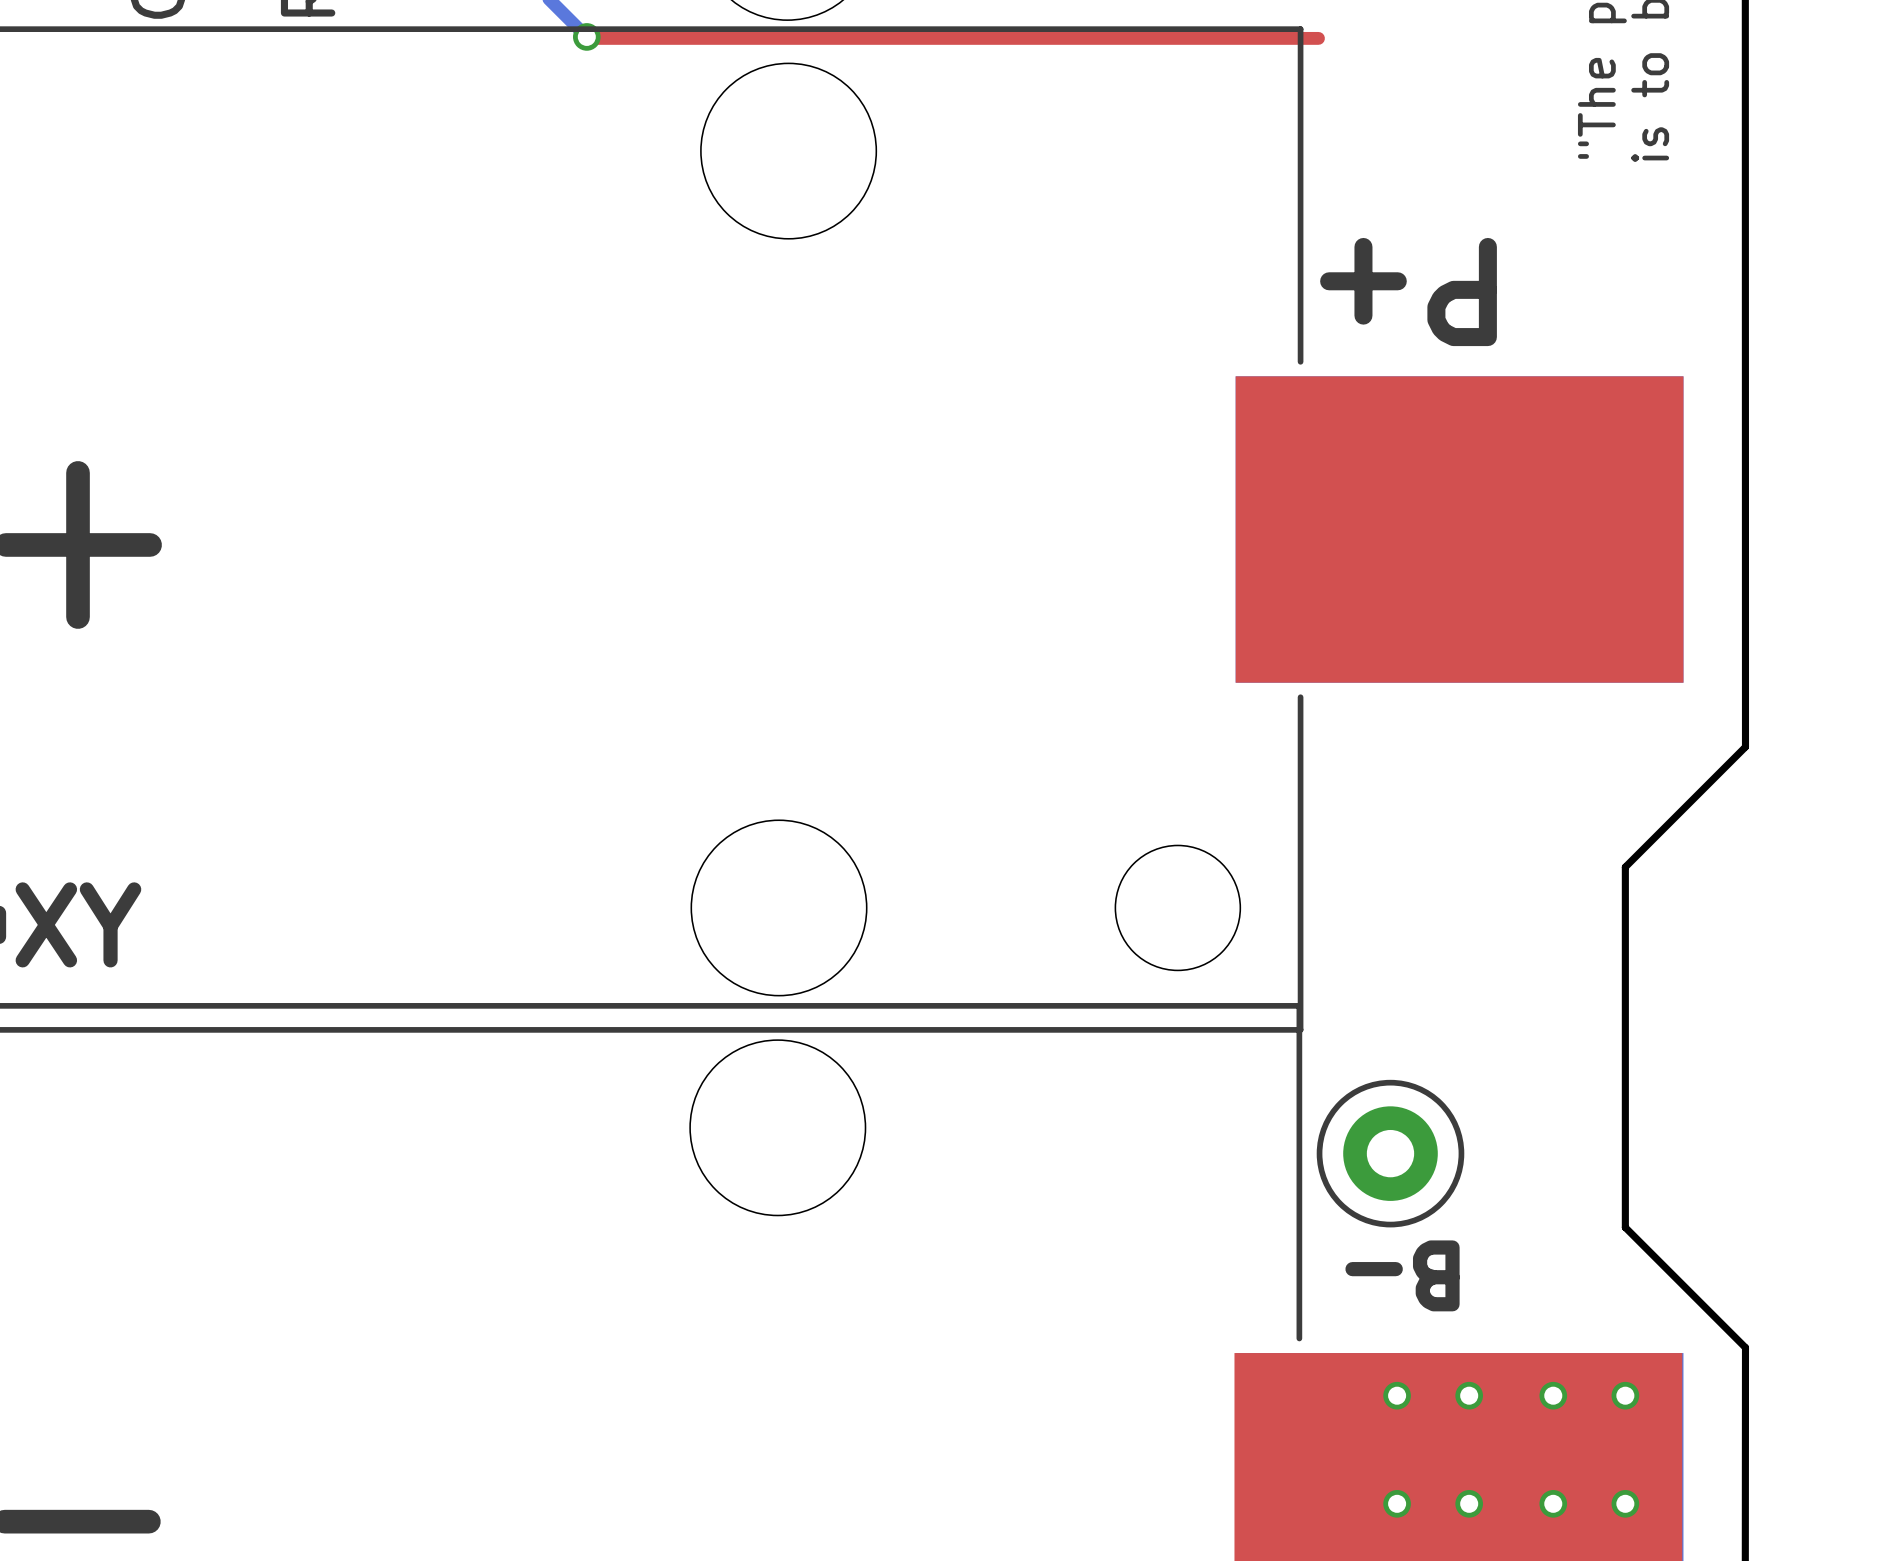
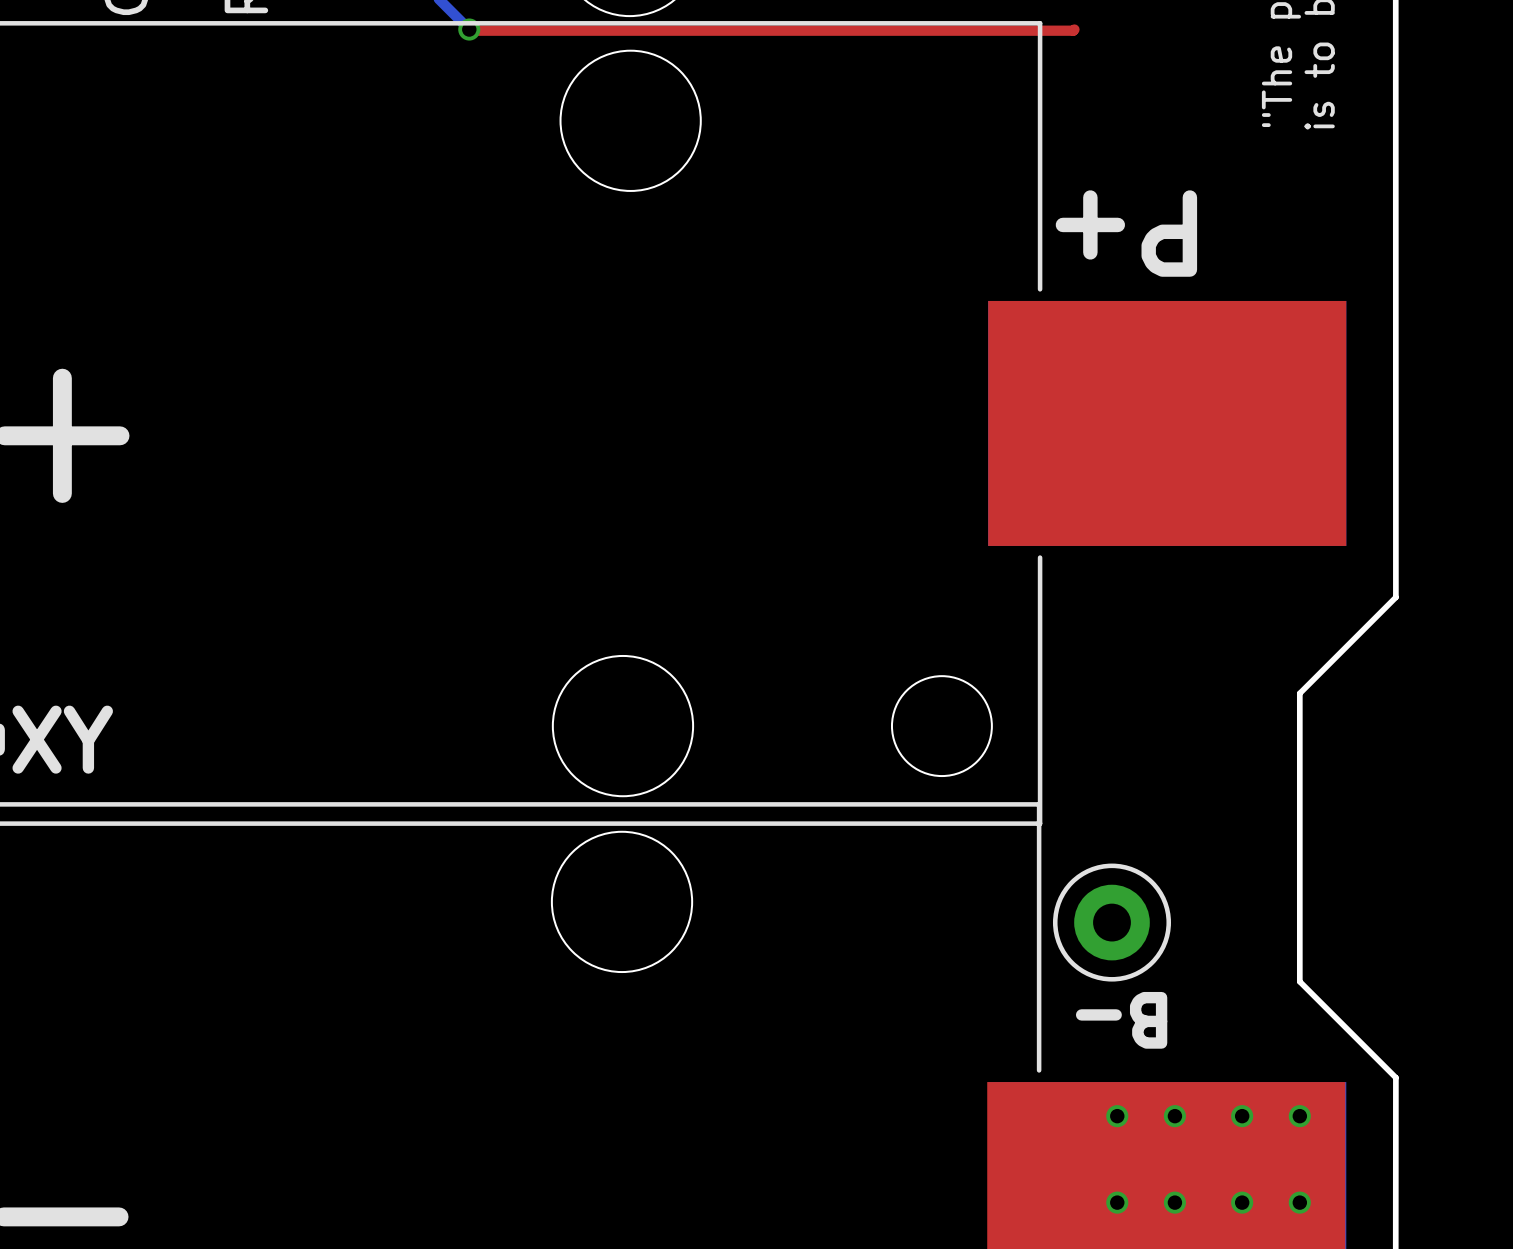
top track: none -> (1074, 29) (1054, 30)

